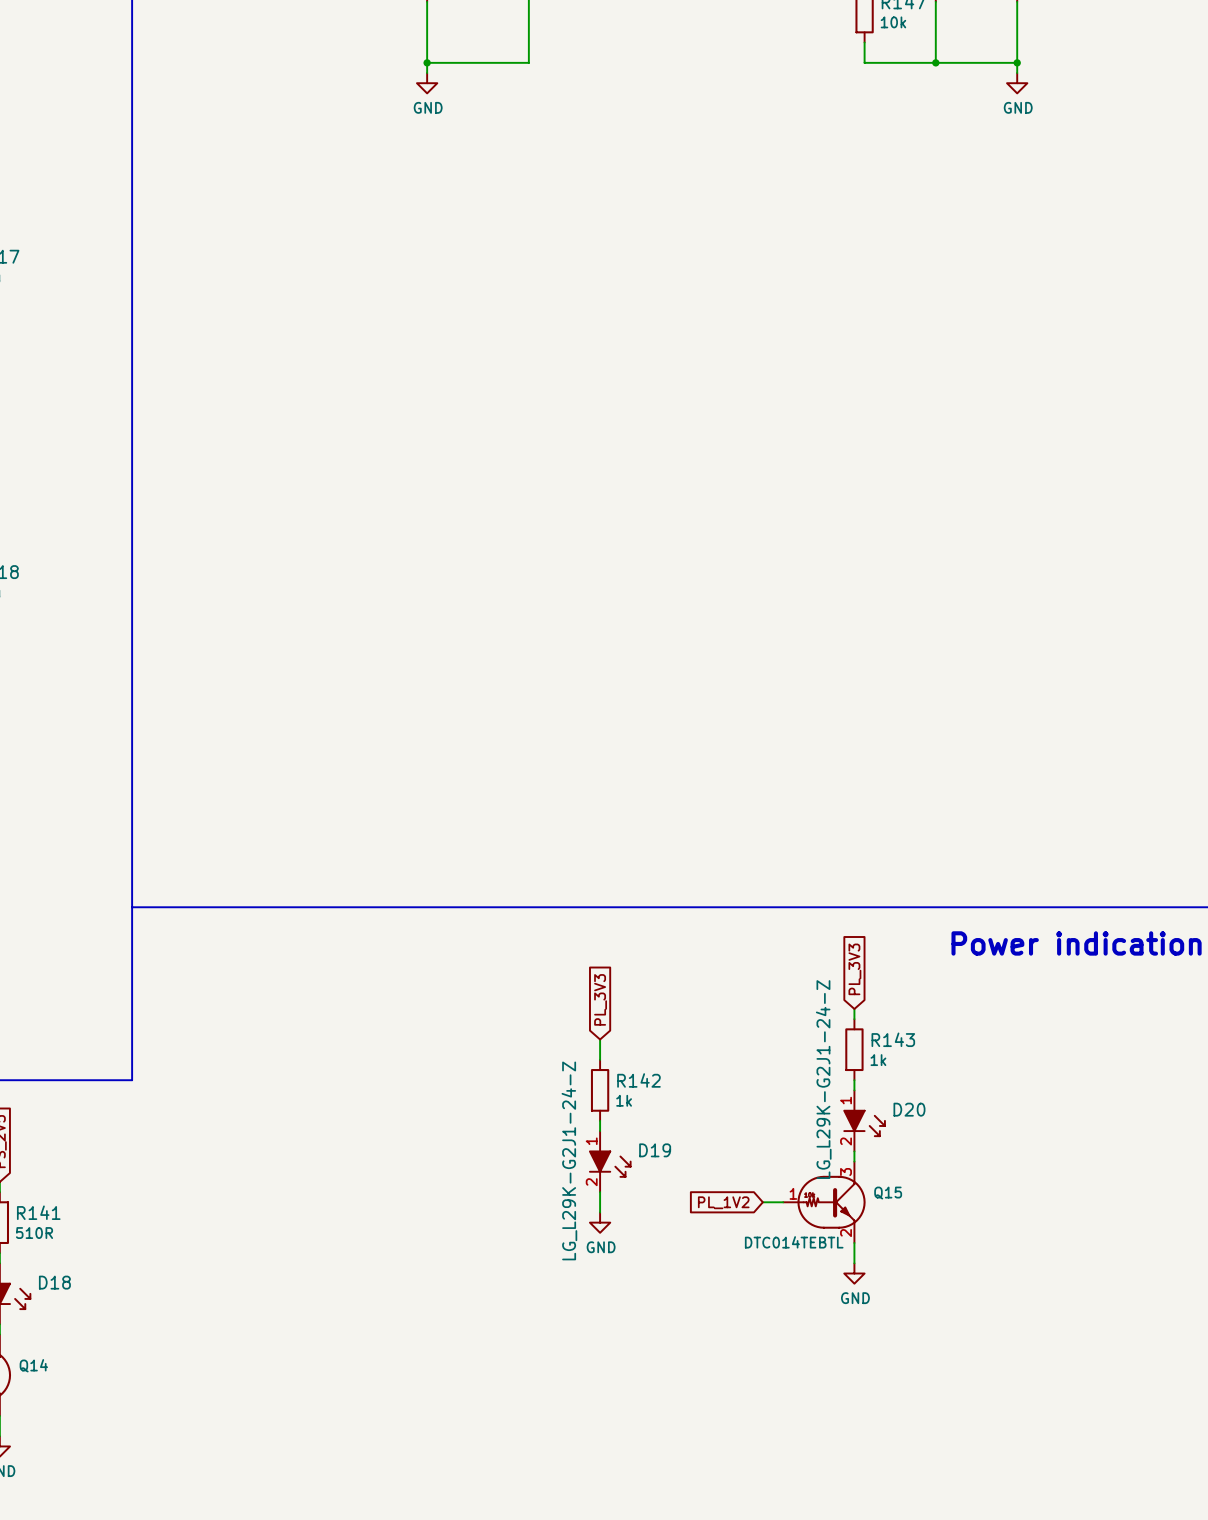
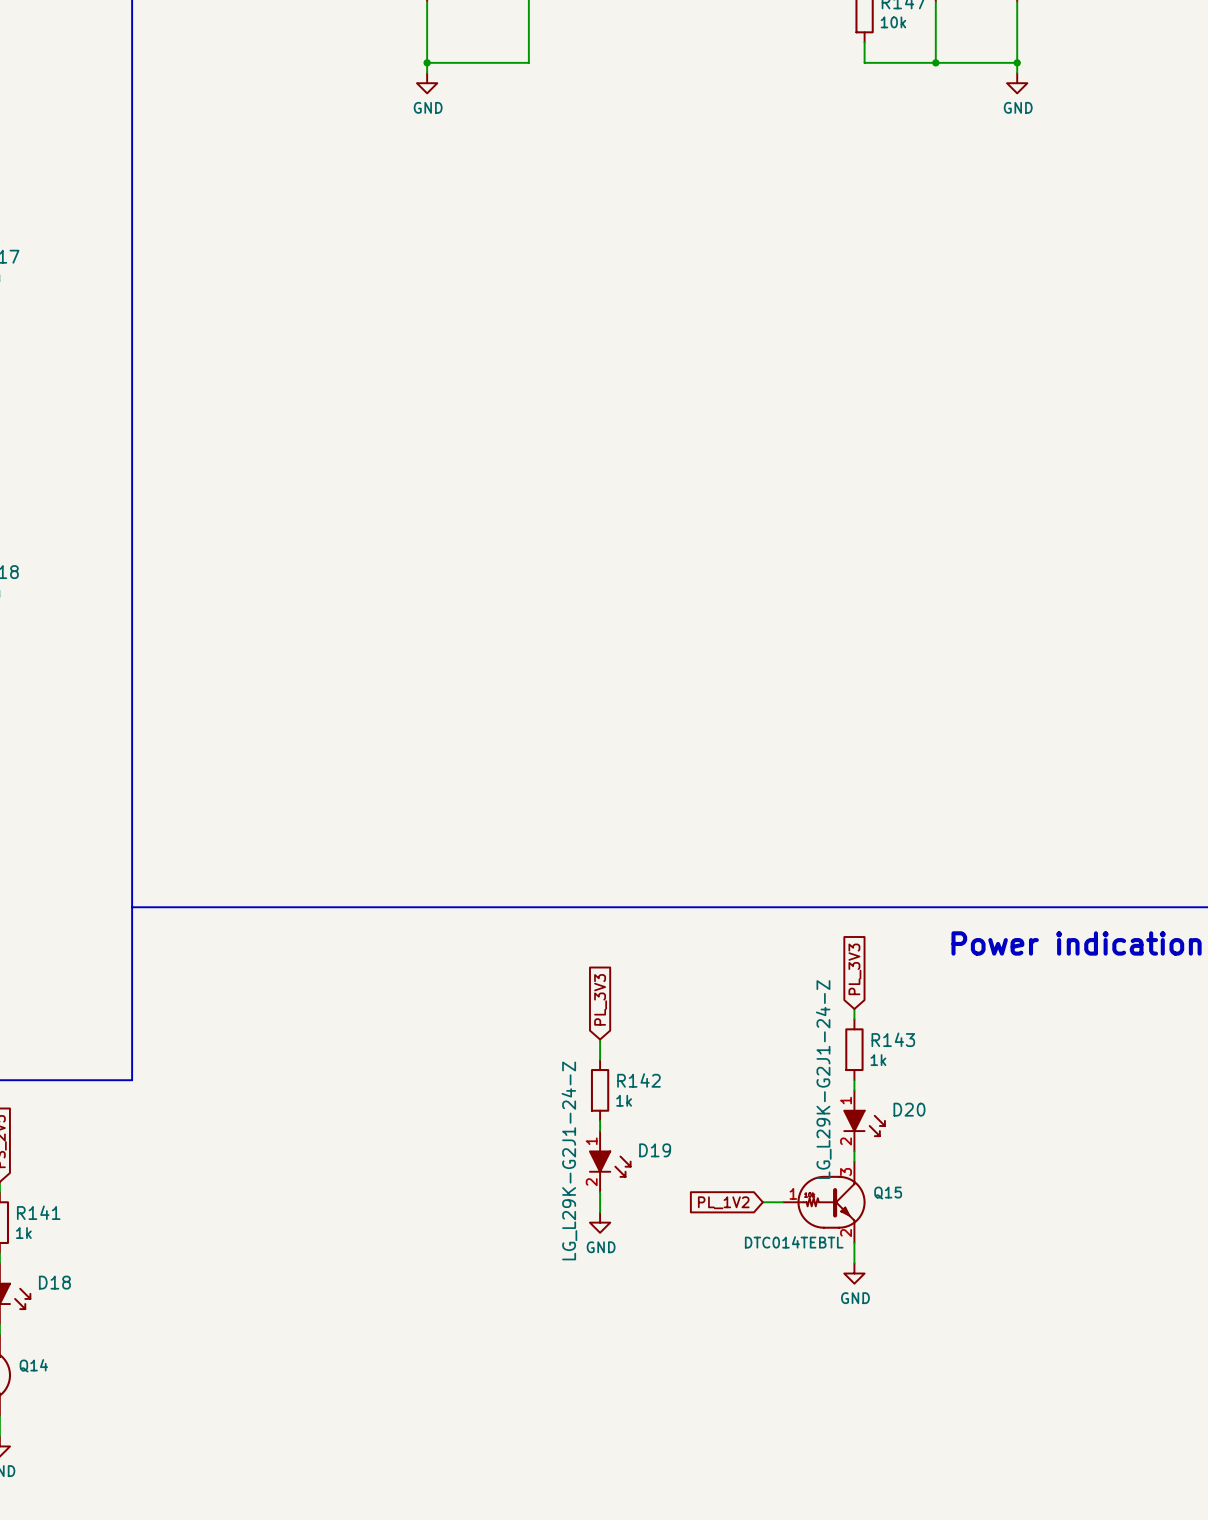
R141 text: 510R (34, 1233) -> 1k (23, 1233)

